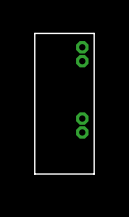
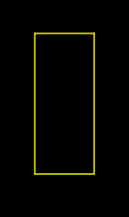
part: (82, 47) -> none
part: (82, 61) -> none
part: (82, 118) -> none
part: (82, 132) -> none

